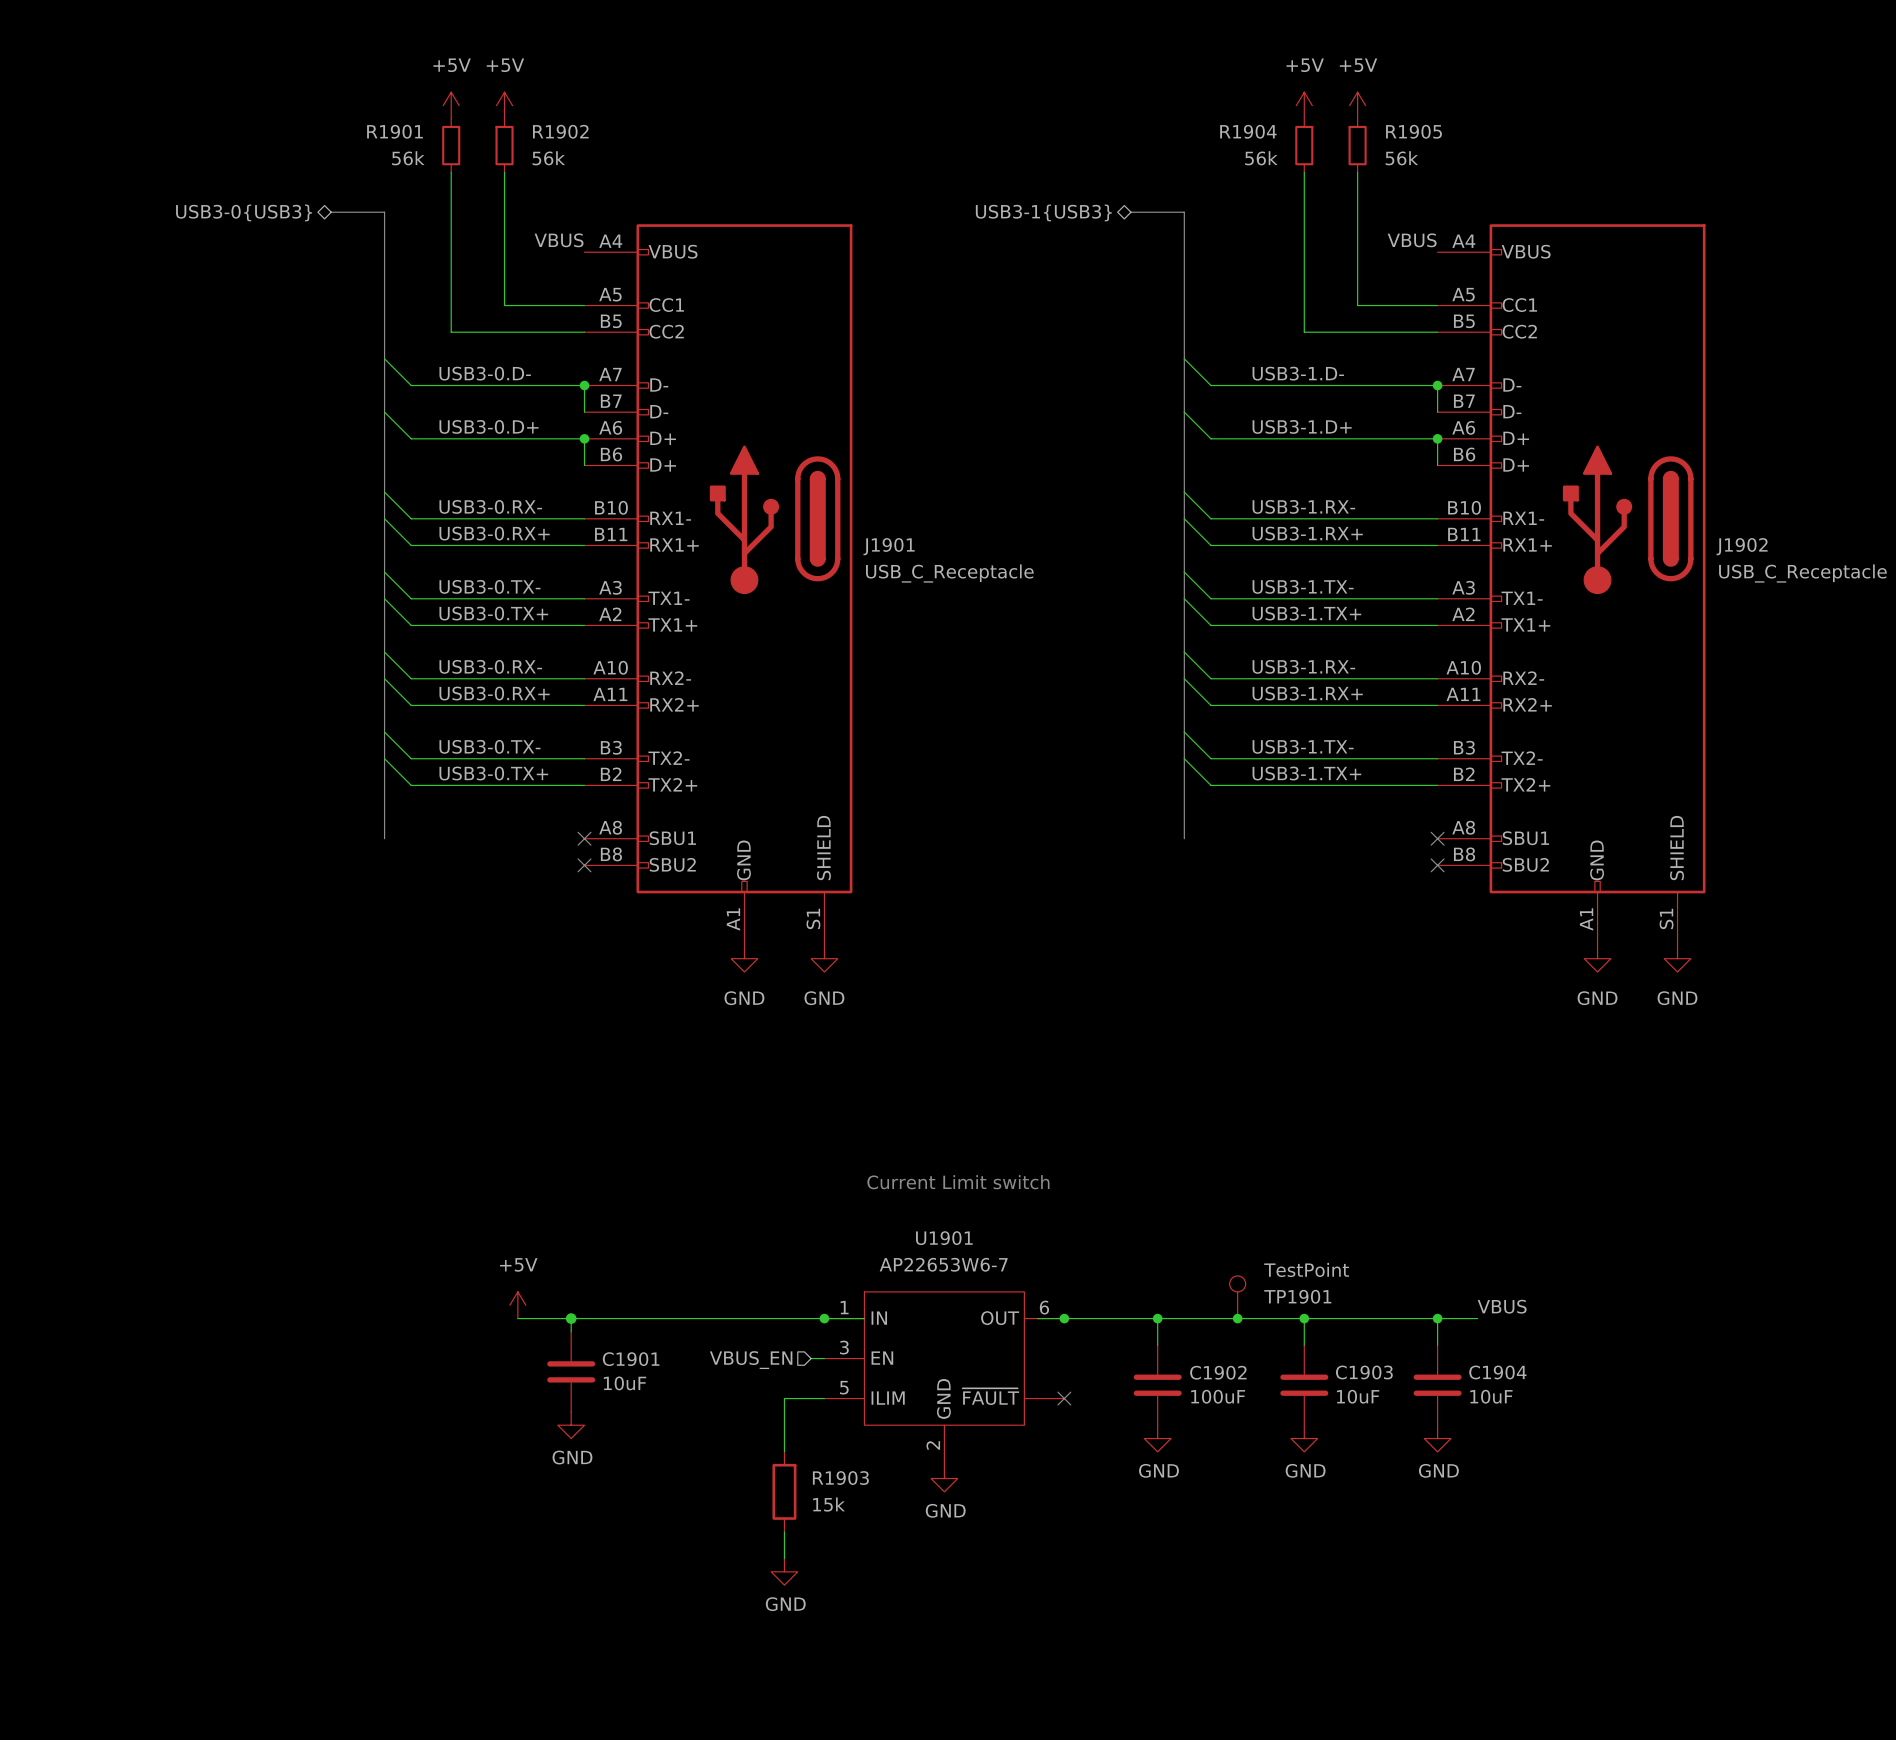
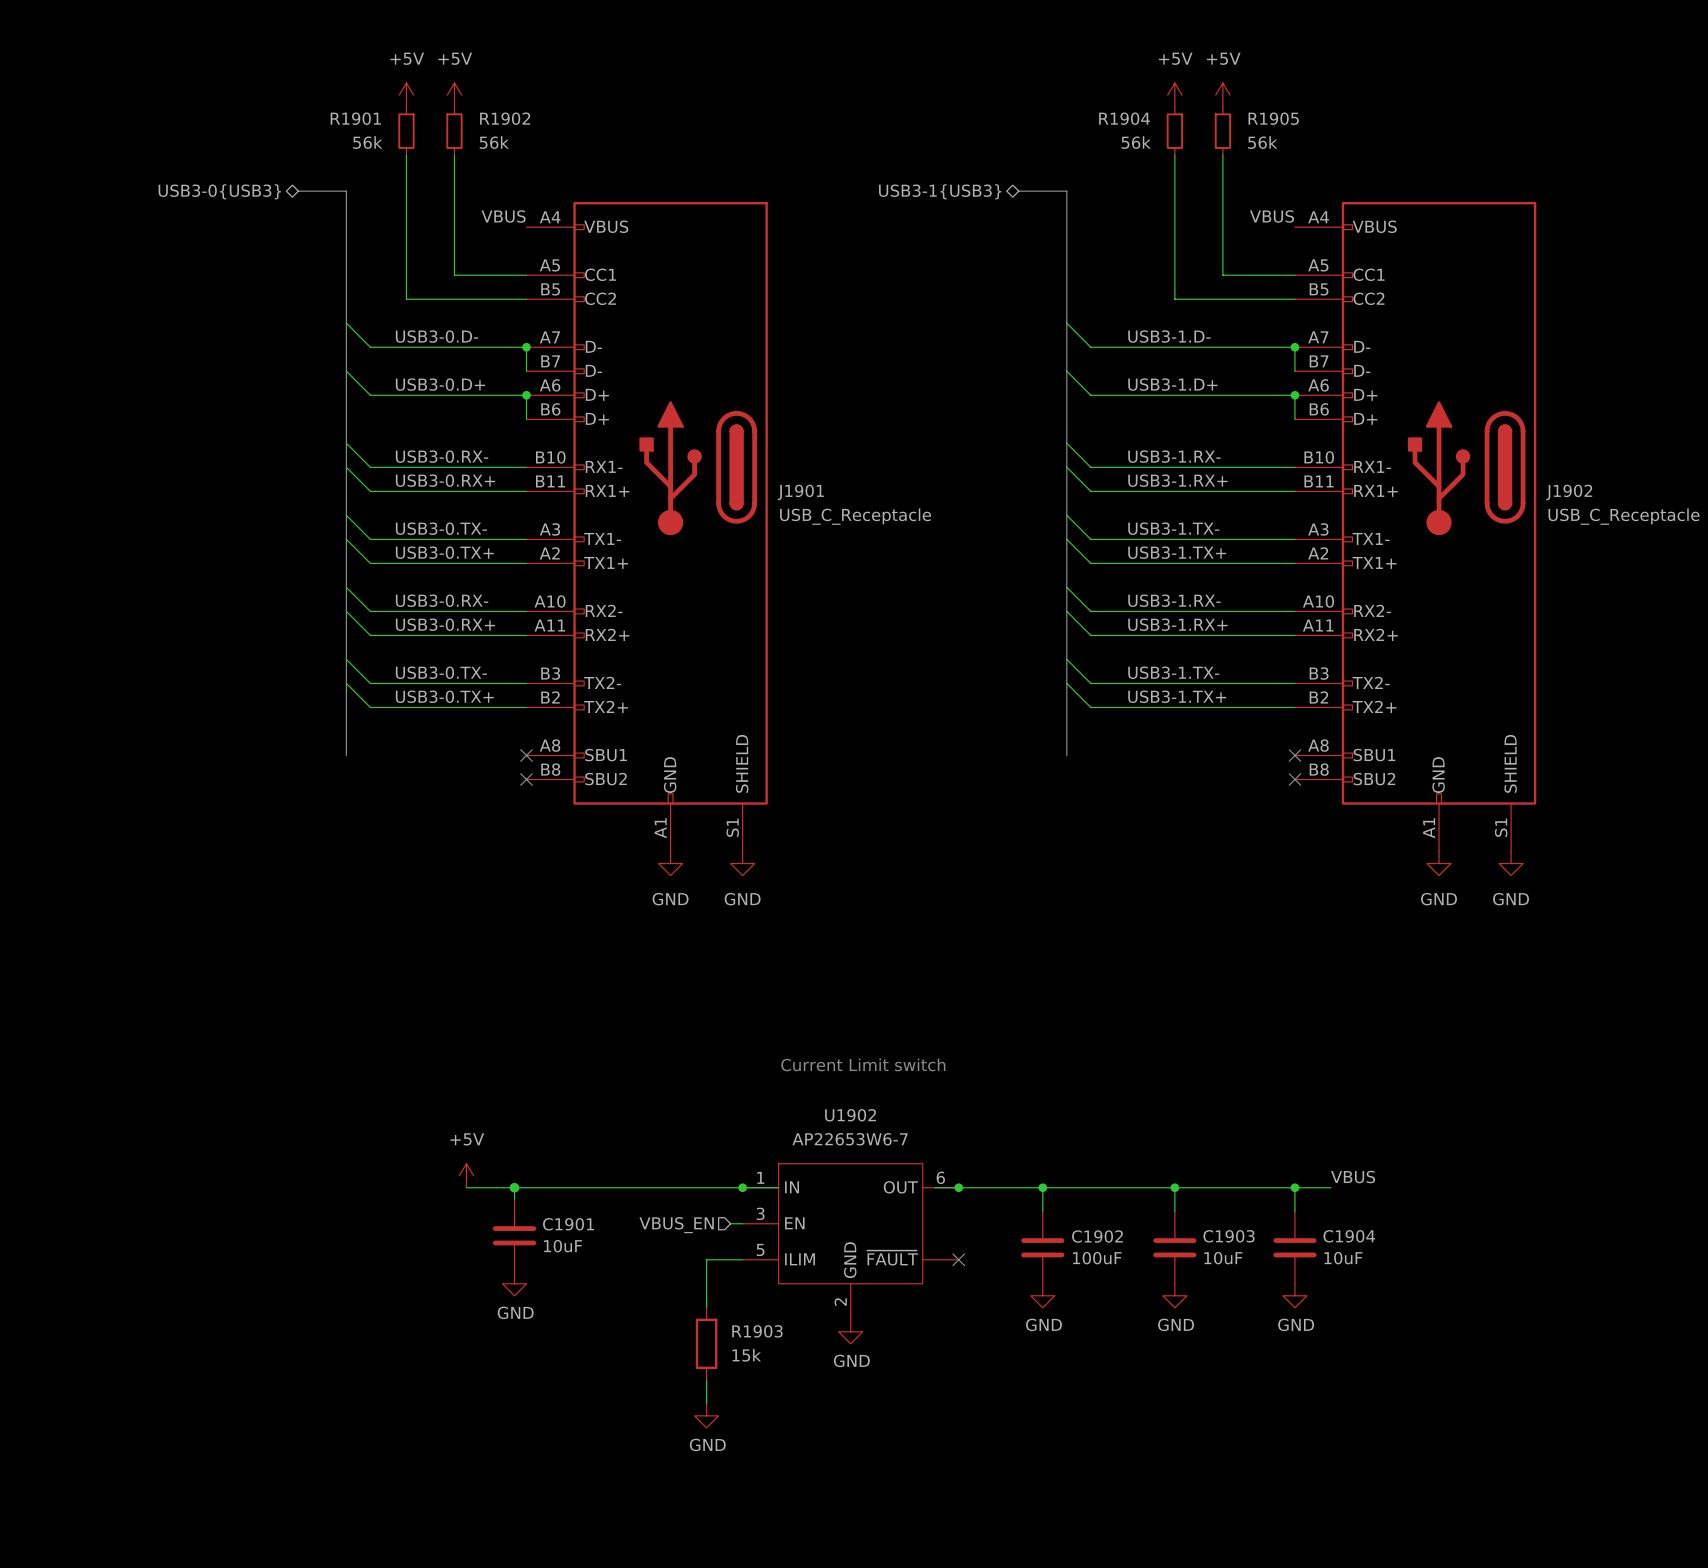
U1901 name: U1901 (944, 1238) -> U1902 (850, 1115)
TP1901: TestPoint (1237, 1297) -> none
junction: (1237, 1318) -> none

